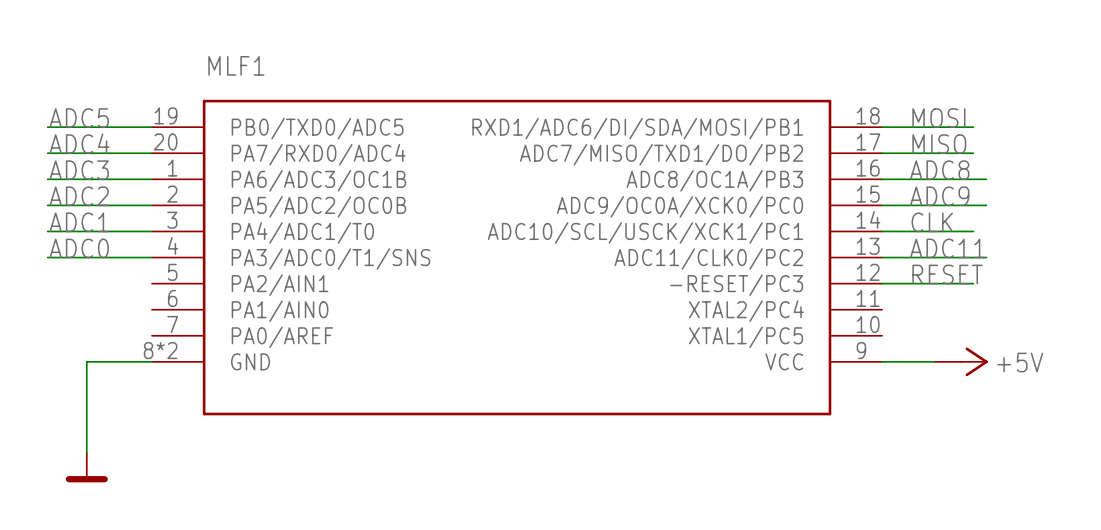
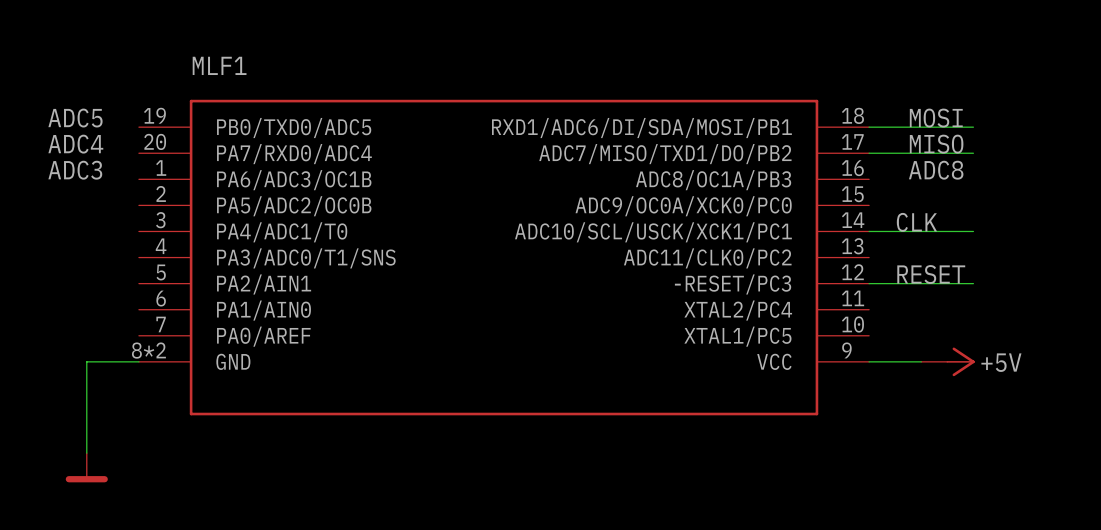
wire: (47, 127) (151, 127) -> none
wire: (47, 153) (151, 153) -> none
wire: (47, 179) (151, 179) -> none
wire: (882, 179) (986, 179) -> none
label: ADC2 (79, 196) -> none
label: ADC9 (939, 196) -> none
wire: (47, 205) (151, 205) -> none
wire: (882, 205) (986, 205) -> none
label: ADC1 (79, 222) -> none
label position: CLK (932, 222) -> CLK (916, 222)
wire: (47, 231) (151, 231) -> none
label: ADC0 (79, 248) -> none
label: ADC11 (947, 248) -> none
wire: (47, 257) (151, 257) -> none
MLF1 position: (517, 257) -> (504, 257)
wire: (882, 257) (986, 257) -> none
label position: RESET (947, 274) -> RESET (931, 274)
power symbol position: +5V (961, 361) -> +5V (947, 361)

